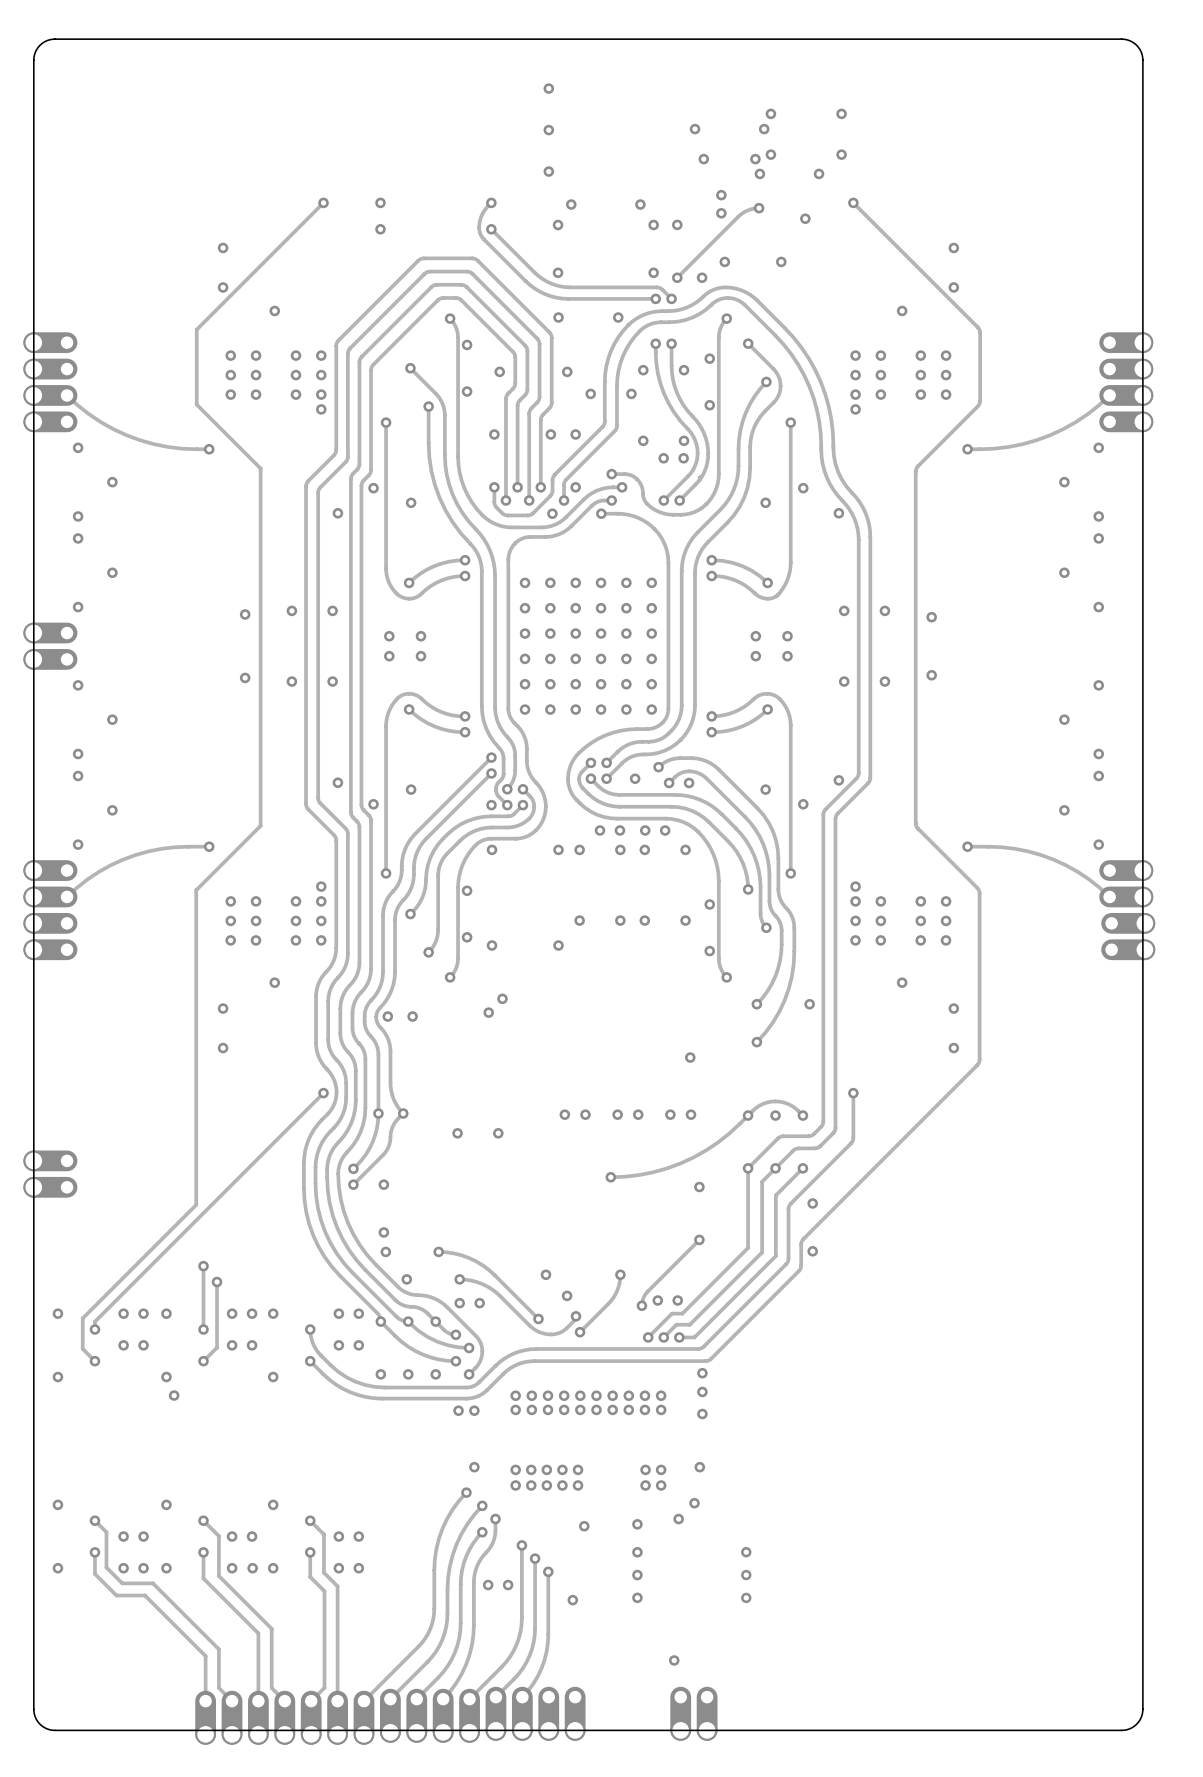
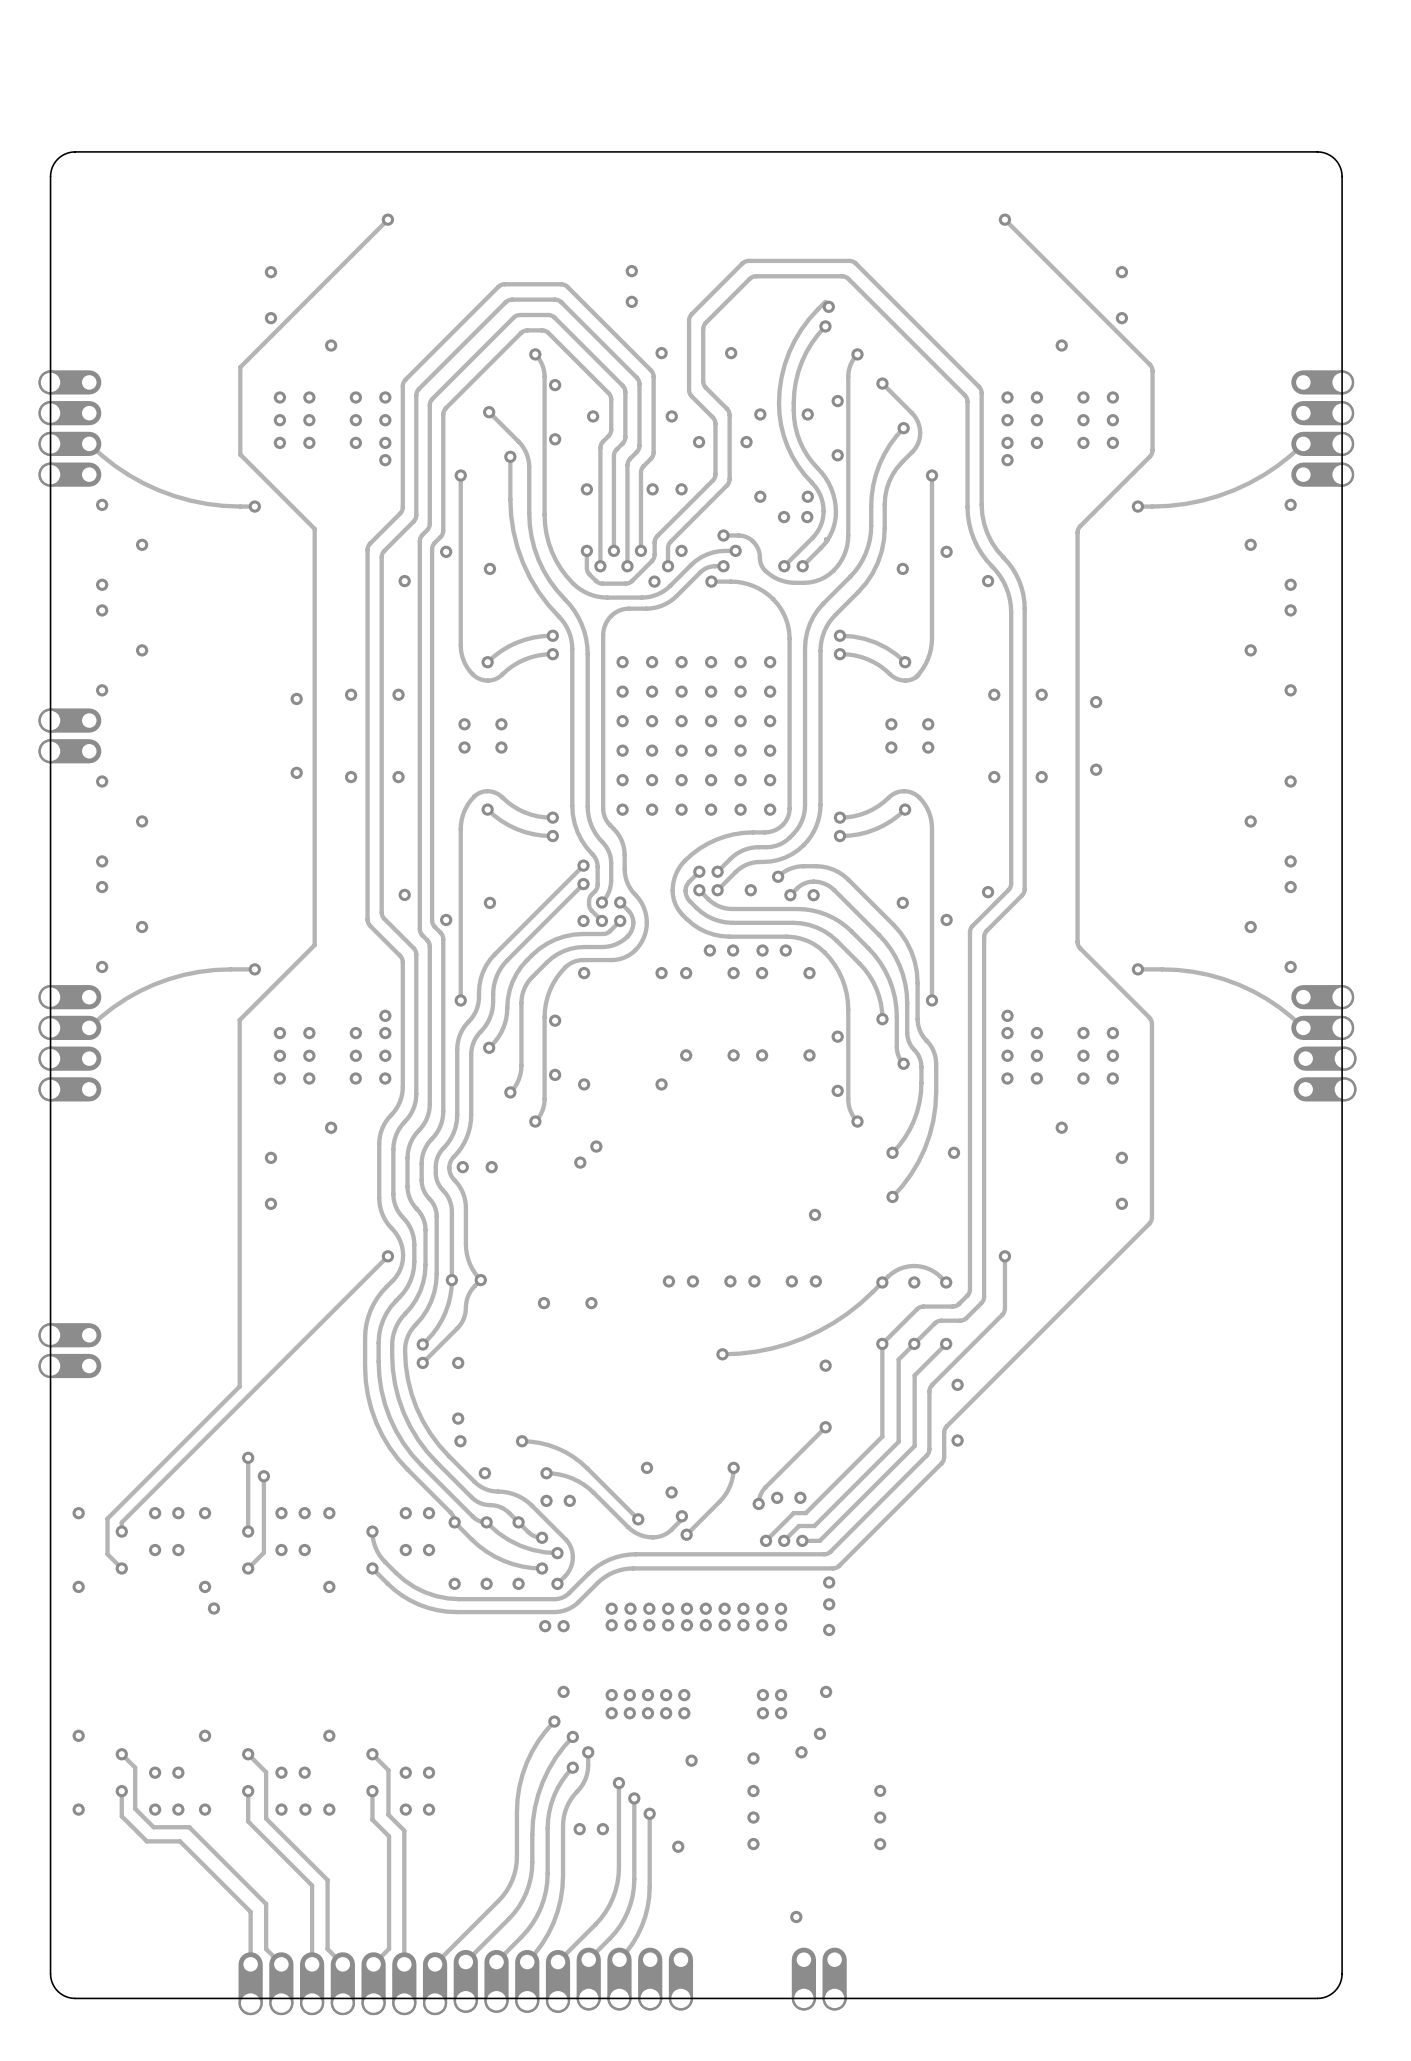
via: (548, 88) -> none
via: (770, 113) -> none
via: (841, 113) -> none
via: (695, 129) -> none
via: (764, 129) -> none
via: (548, 130) -> none
via: (770, 154) -> none
via: (841, 154) -> none
via: (703, 159) -> none
via: (755, 159) -> none
board edge: (1142, 165) (1142, 57) (1140, 49) (1134, 43) (1121, 39) (52, 39) (39, 45) (33, 57) (33, 165) -> (1342, 176) (1340, 167) (1334, 159) (1326, 153) (1317, 151) (75, 151) (65, 153) (57, 159) (52, 167) (50, 176)
via: (548, 171) -> none
via: (759, 173) -> none
via: (819, 173) -> none
via: (721, 195) -> none
via: (380, 202) -> none
track: (491, 202) (480, 218) (479, 227) (481, 236) (525, 281) (539, 291) (562, 298) (655, 298) -> none
via: (491, 202) -> none
via: (571, 204) -> none
via: (640, 204) -> none
track: (759, 208) (750, 209) (740, 214) (677, 277) -> none
via: (759, 208) -> none
via: (721, 213) -> none
via: (805, 218) -> none
via: (677, 224) -> none
via: (558, 225) -> none
via: (653, 225) -> none
via: (380, 229) -> none
track: (491, 229) (534, 272) (551, 283) (570, 287) (657, 287) (671, 298) -> none
via: (491, 229) -> none
via: none -> (631, 271)
via: (724, 261) -> none
via: (781, 261) -> none
via: (558, 272) -> none
via: (653, 272) -> none
via: none -> (631, 301)
via: (677, 277) -> none
via: none -> (825, 326)
via: (655, 298) -> none
via: (671, 298) -> none
track: (711, 304) (725, 298) (741, 302) (791, 354) (804, 375) (813, 397) (819, 421) (821, 446) -> (729, 433) (728, 410) (703, 383) (703, 329) (705, 323) (753, 276) (844, 276) (966, 397) (967, 503)
track: (711, 304) (692, 317) (677, 321) (655, 322) (641, 329) (630, 342) (622, 356) (616, 386) -> none
track: (655, 343) (657, 373) (663, 393) (674, 412) (687, 428) -> (825, 301) (809, 318) (794, 340) (784, 364) (779, 390) (779, 414) (783, 435) (792, 456) (811, 482)
via: (655, 343) -> none
track: (671, 343) (671, 372) (674, 386) (680, 399) (692, 416) -> (825, 326) (806, 351) (798, 371) (794, 392) (794, 418) (797, 434) (807, 455) (817, 468)
via: (671, 343) -> none
track: (604, 381) (608, 358) (614, 344) (623, 330) (635, 319) (652, 312) (673, 310) (687, 307) (716, 288) (725, 287) (738, 289) (757, 300) (793, 337) (808, 358) (820, 381) (828, 406) (833, 445) -> (715, 428) (713, 418) (689, 392) (689, 320) (691, 314) (746, 261) (852, 261) (980, 388) (981, 502)

